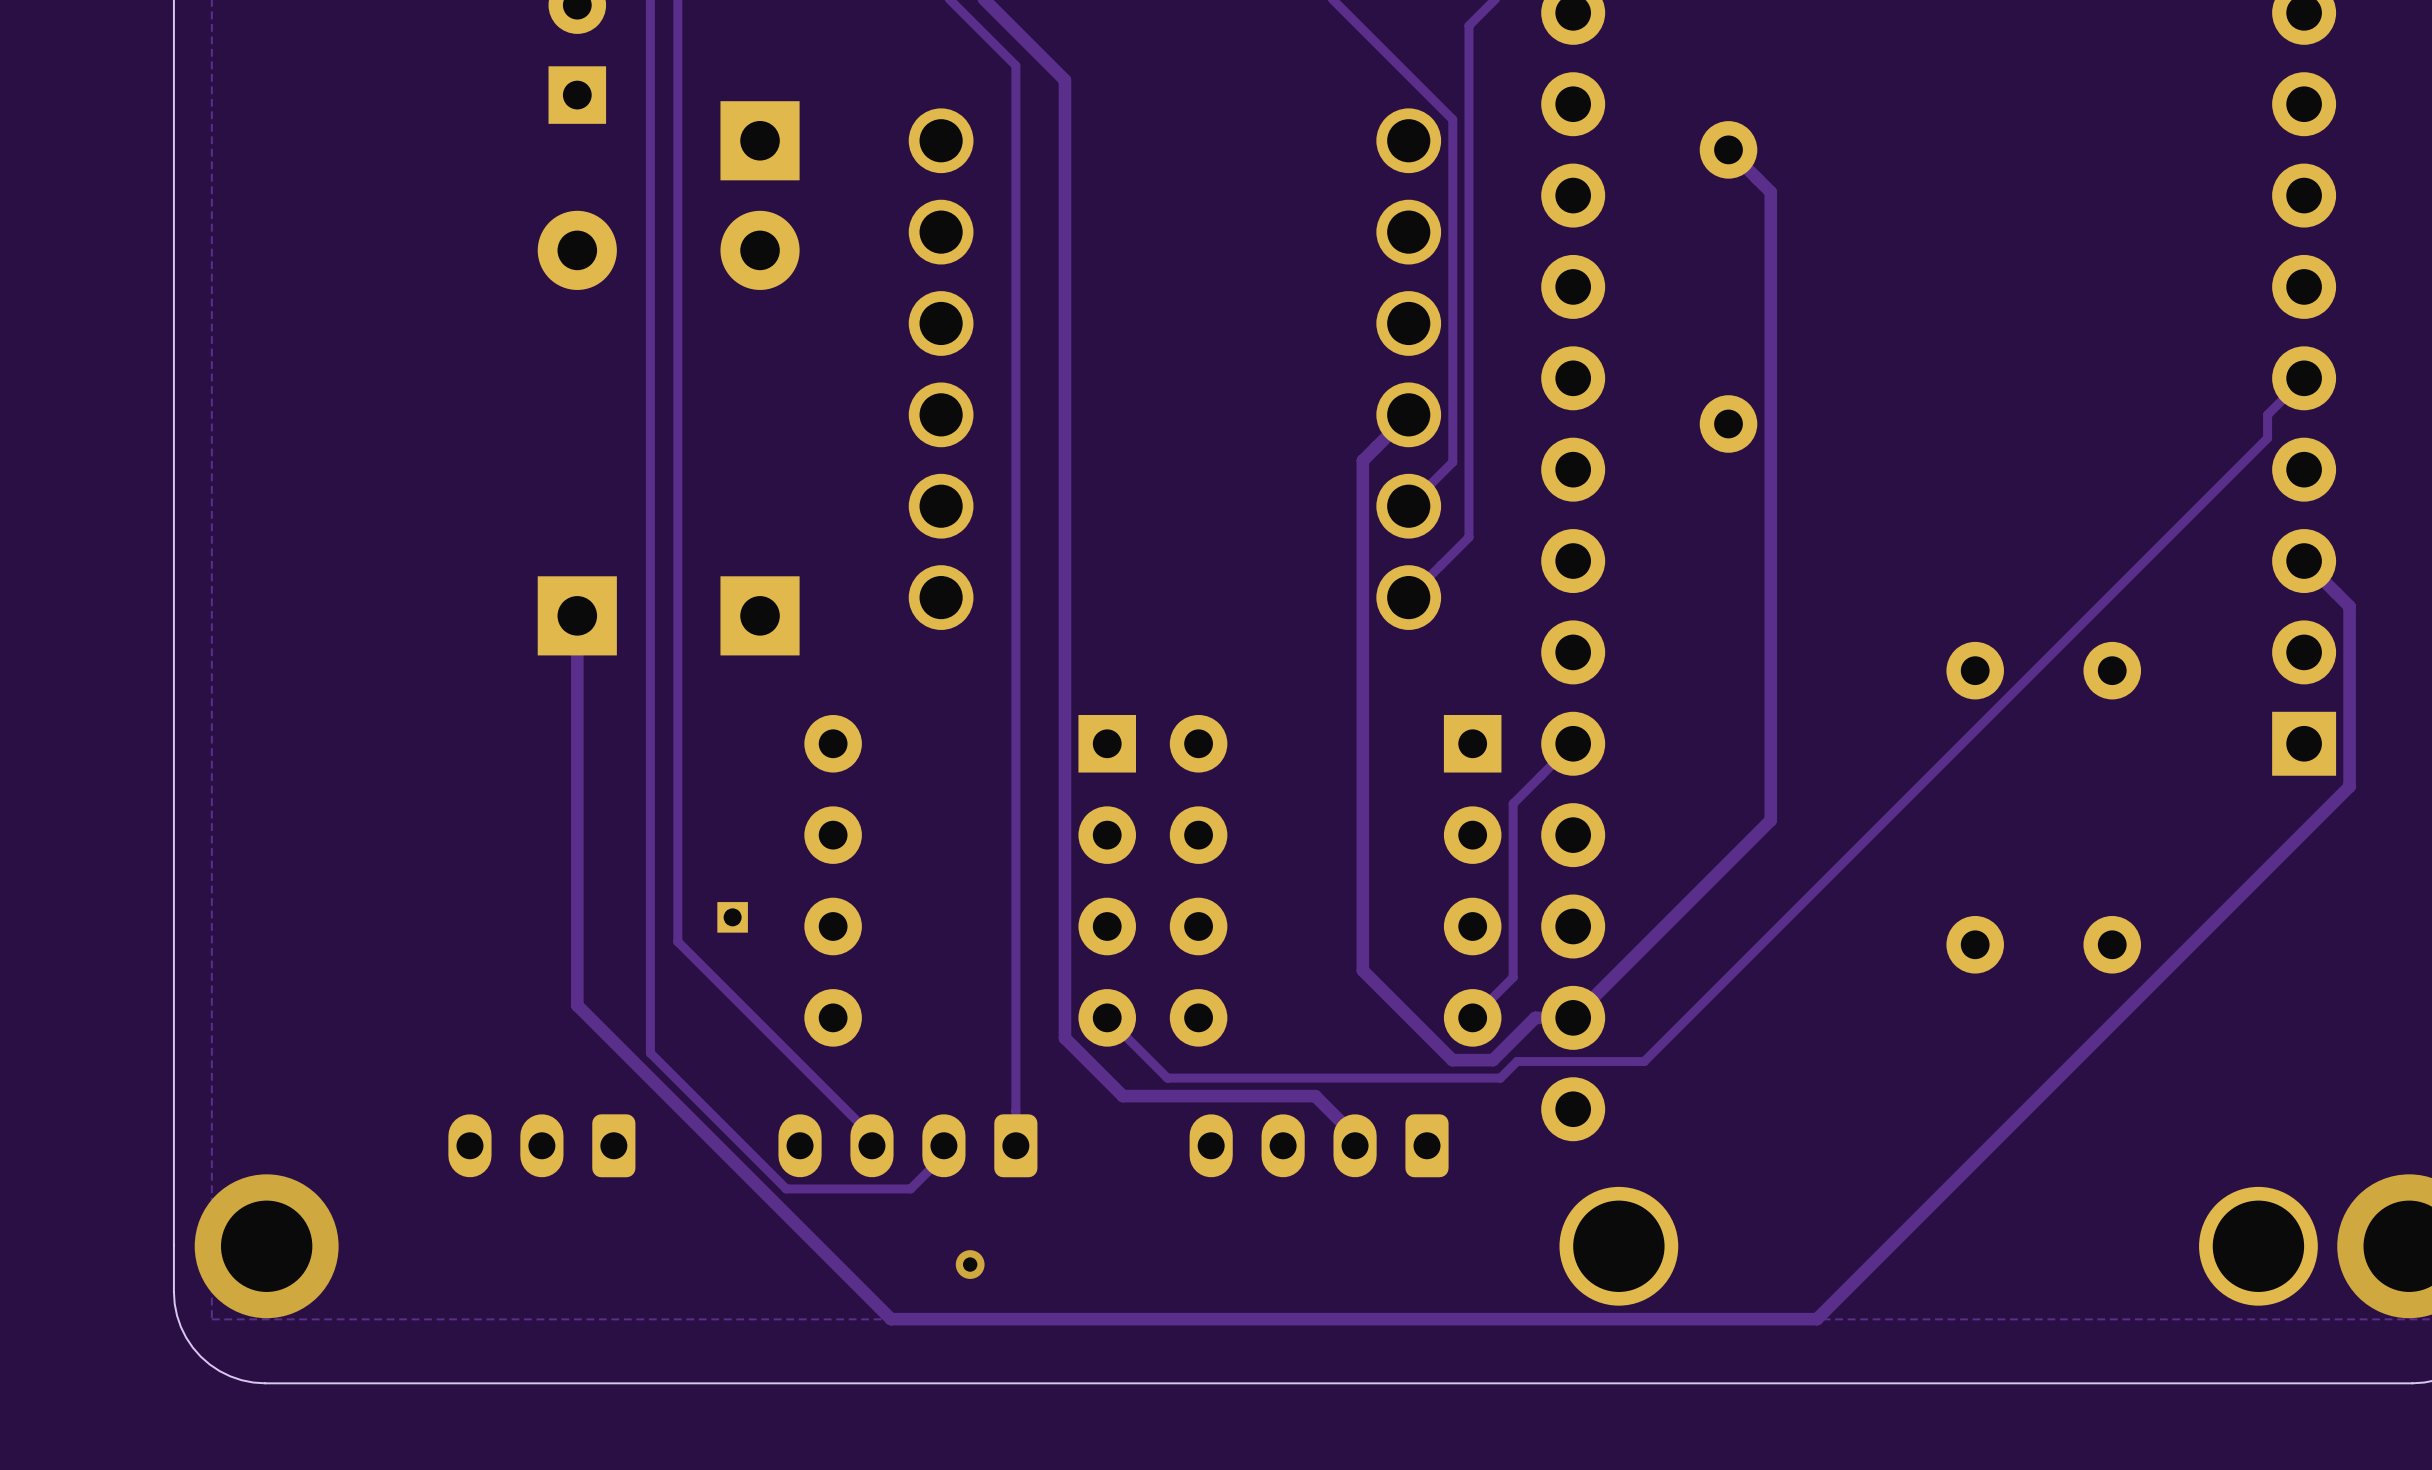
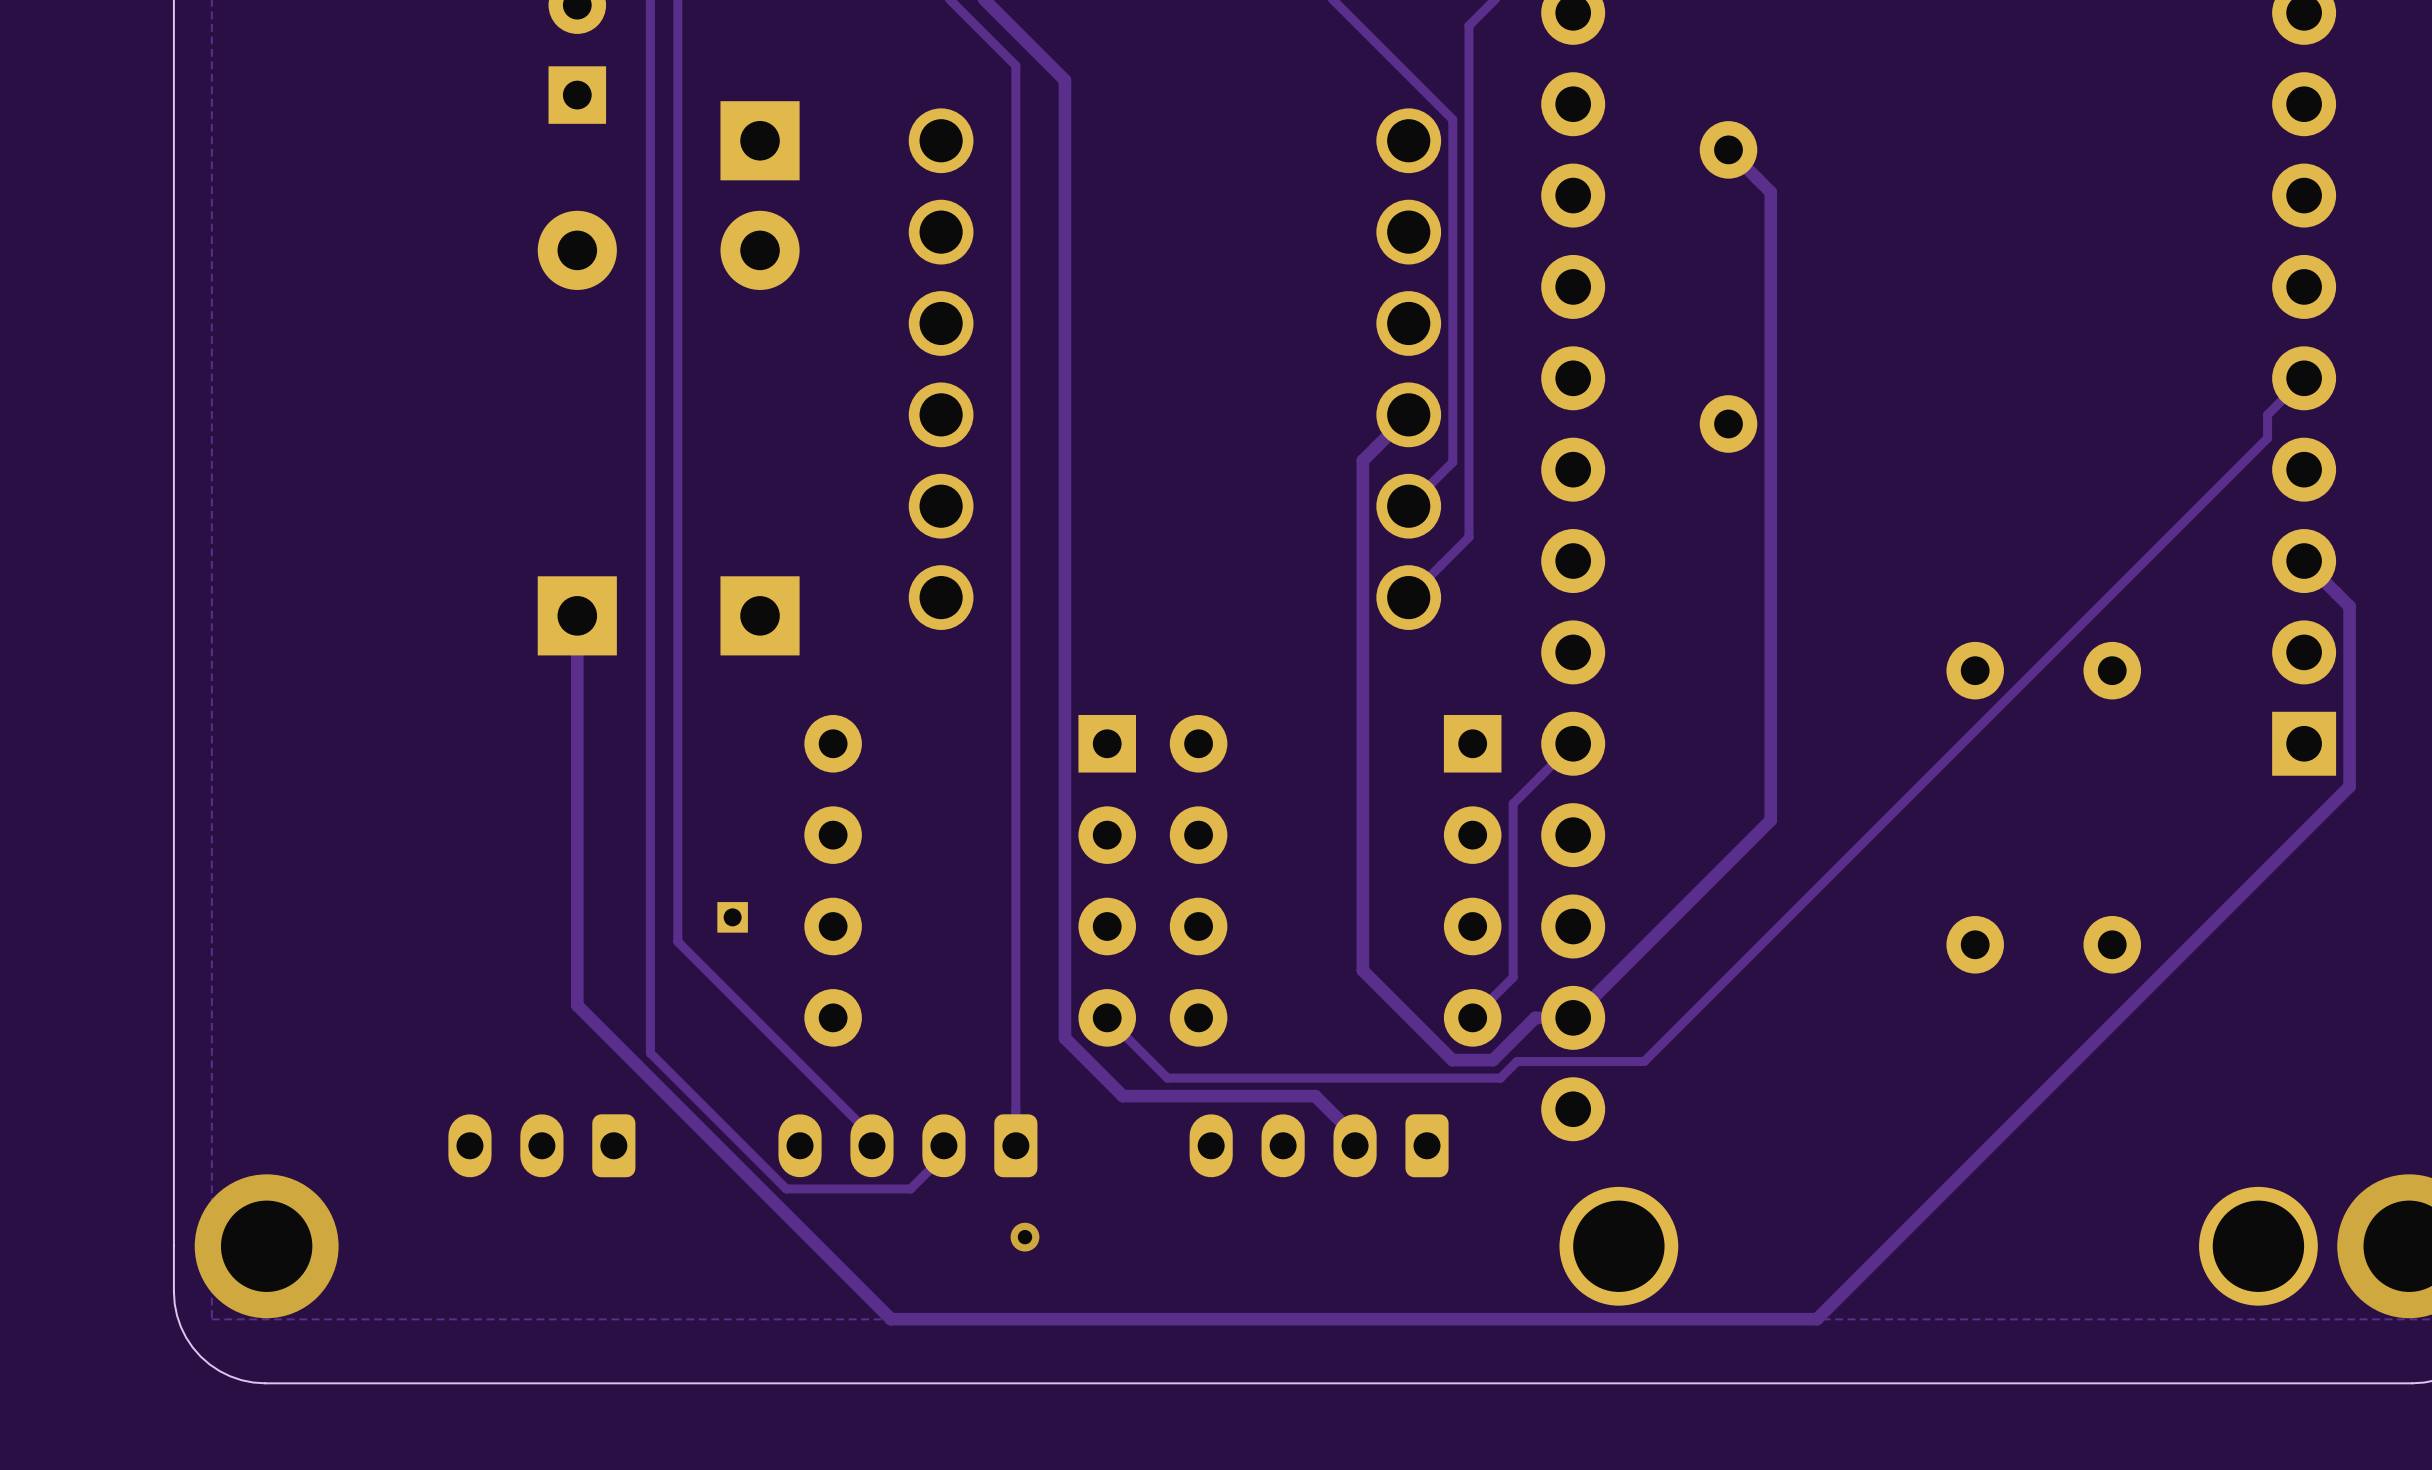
via position: (970, 1264) -> (1024, 1237)

